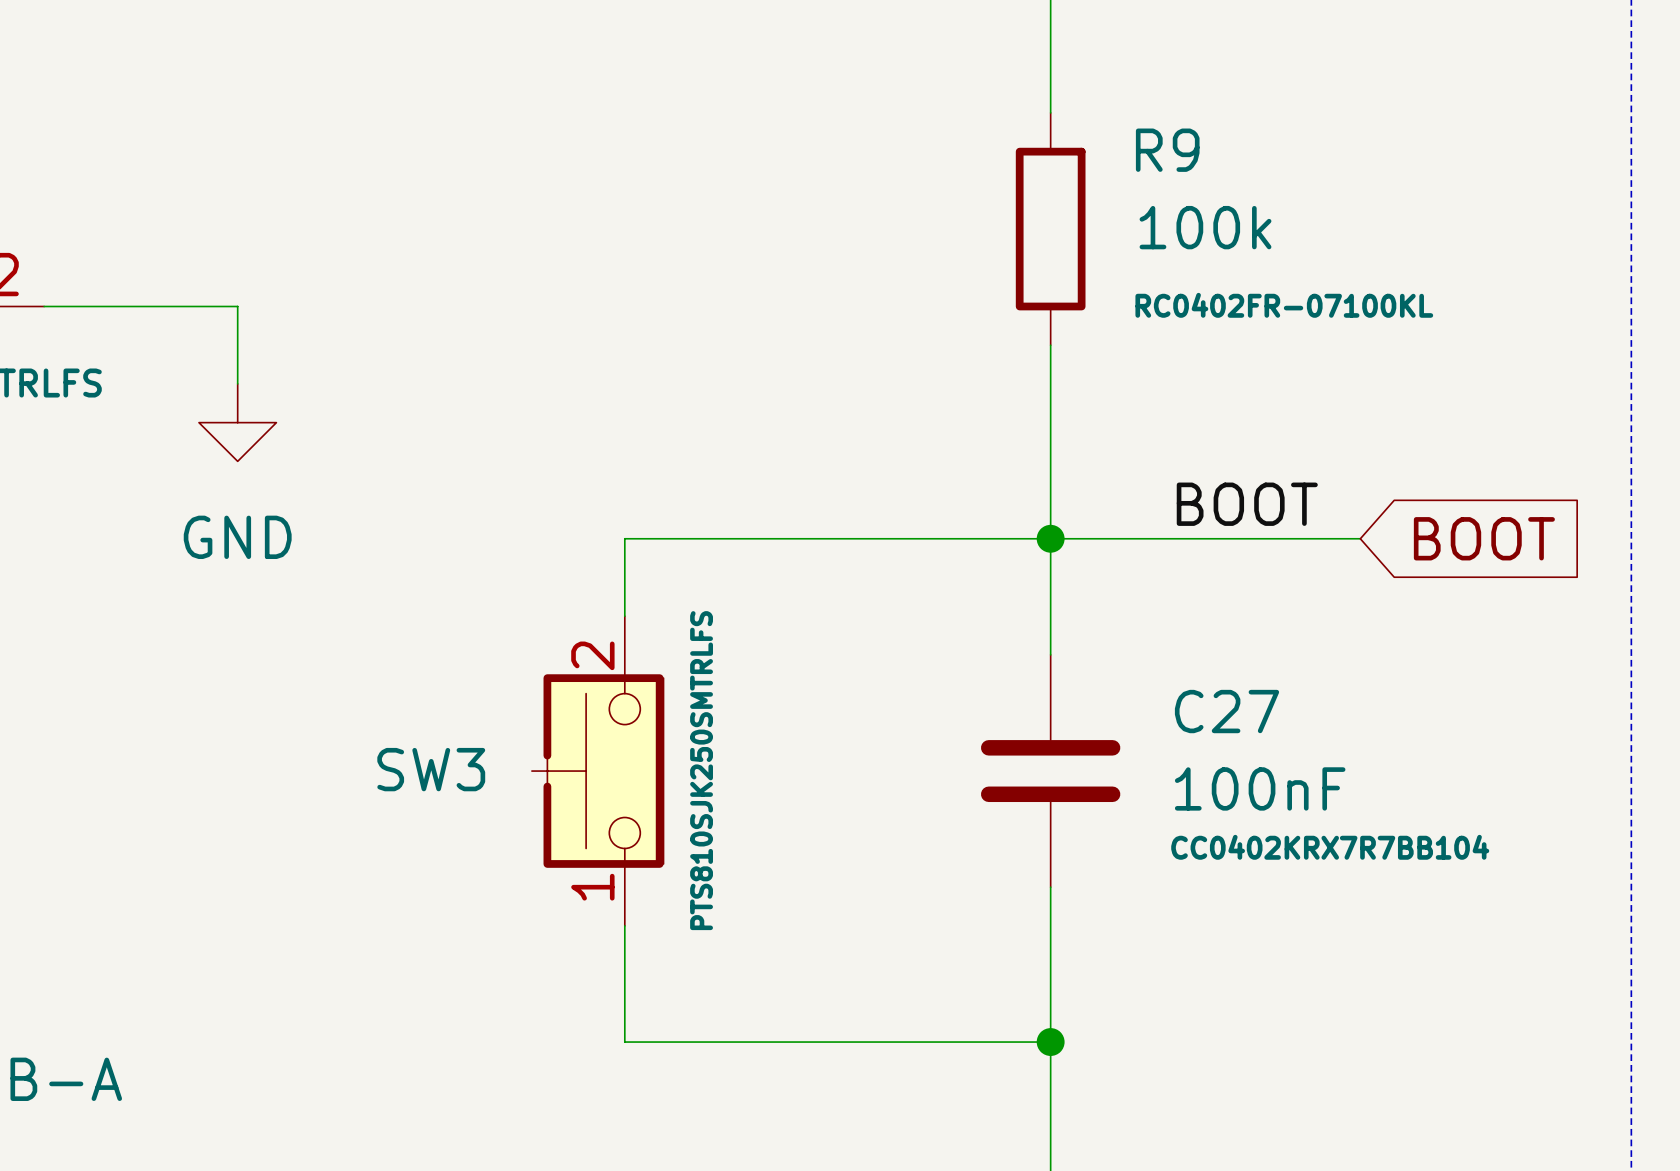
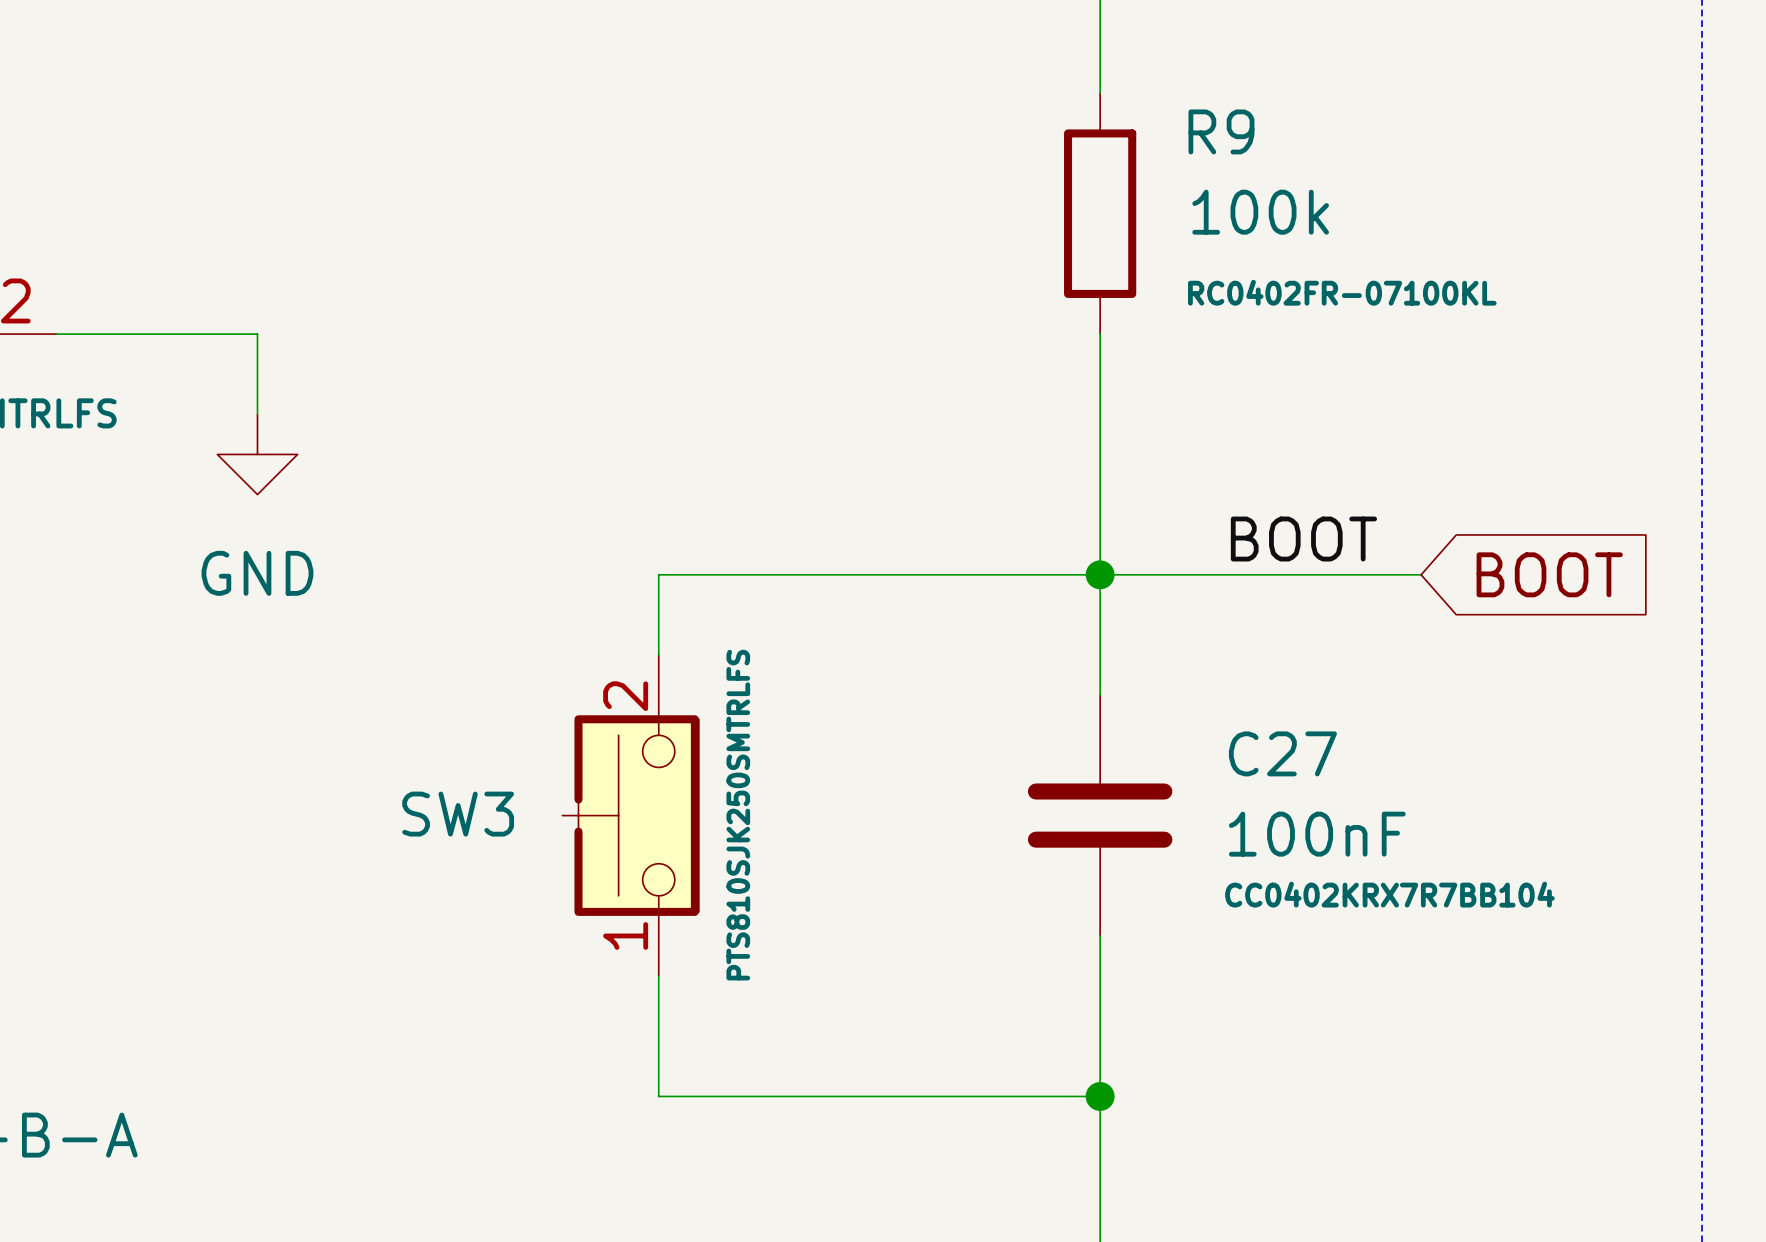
R9 position: (1050, 229) -> (1100, 213)

